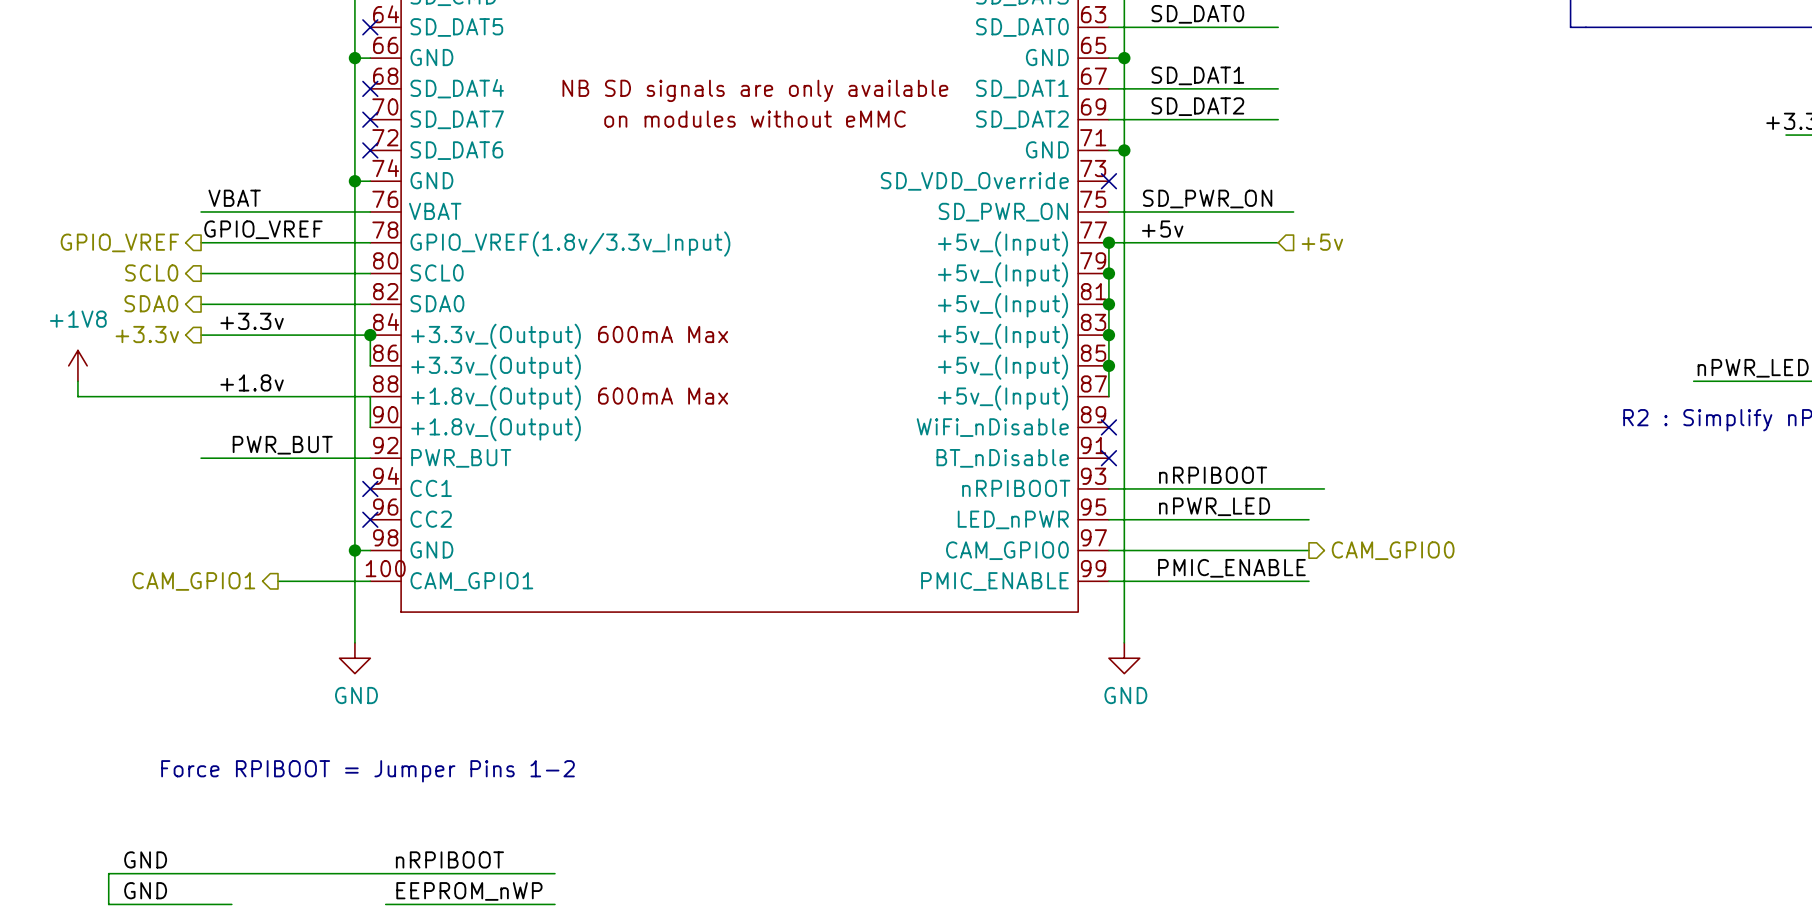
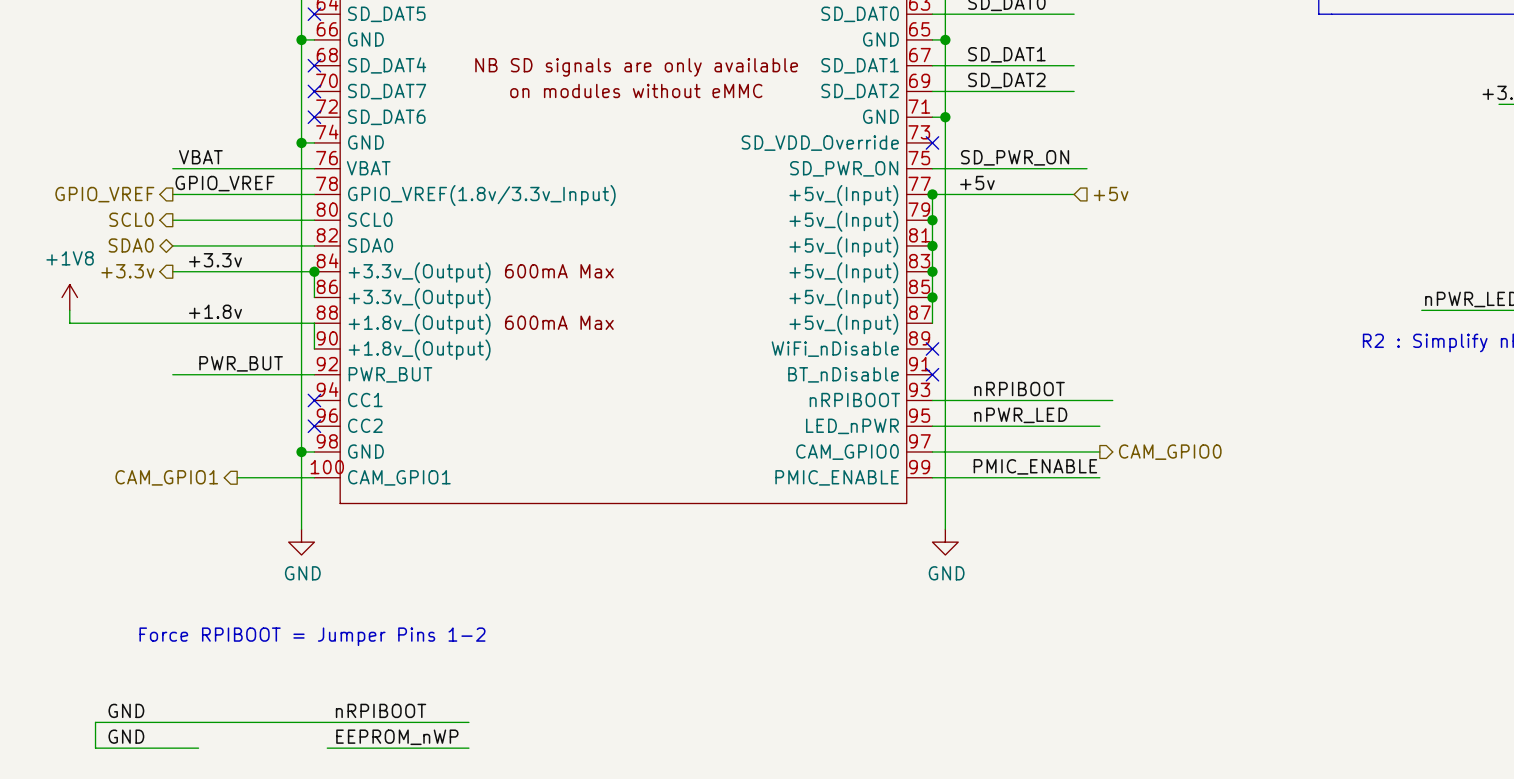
hierarchical label shape: output (151, 303) -> bidirectional (131, 245)

